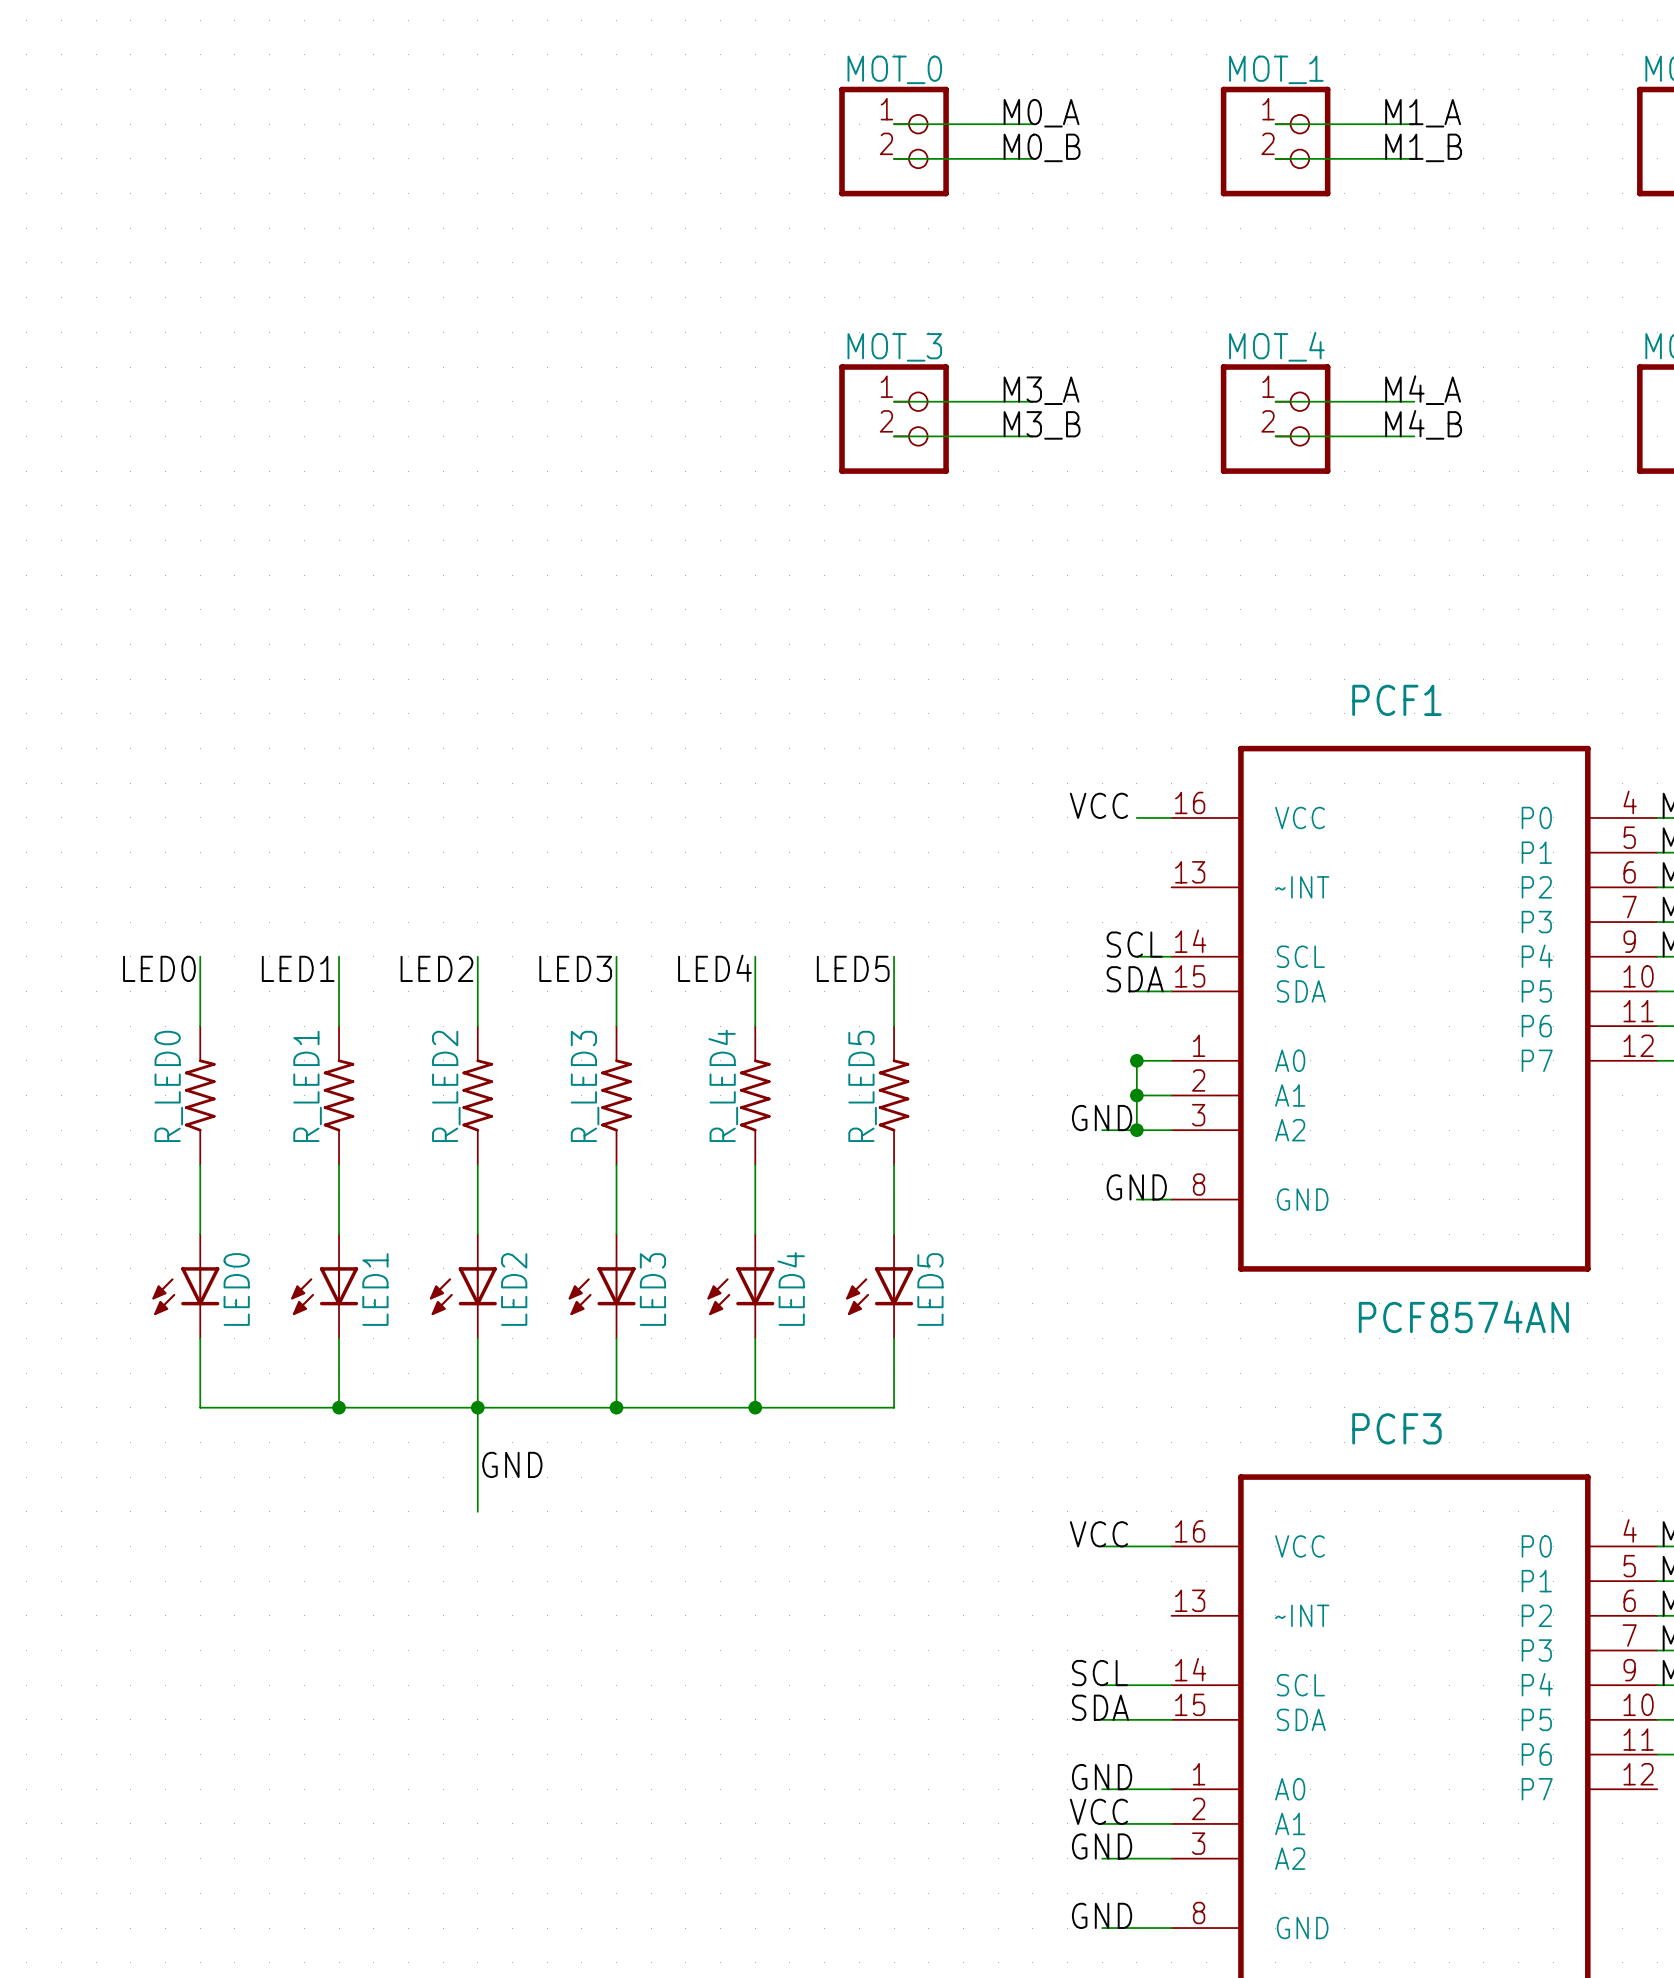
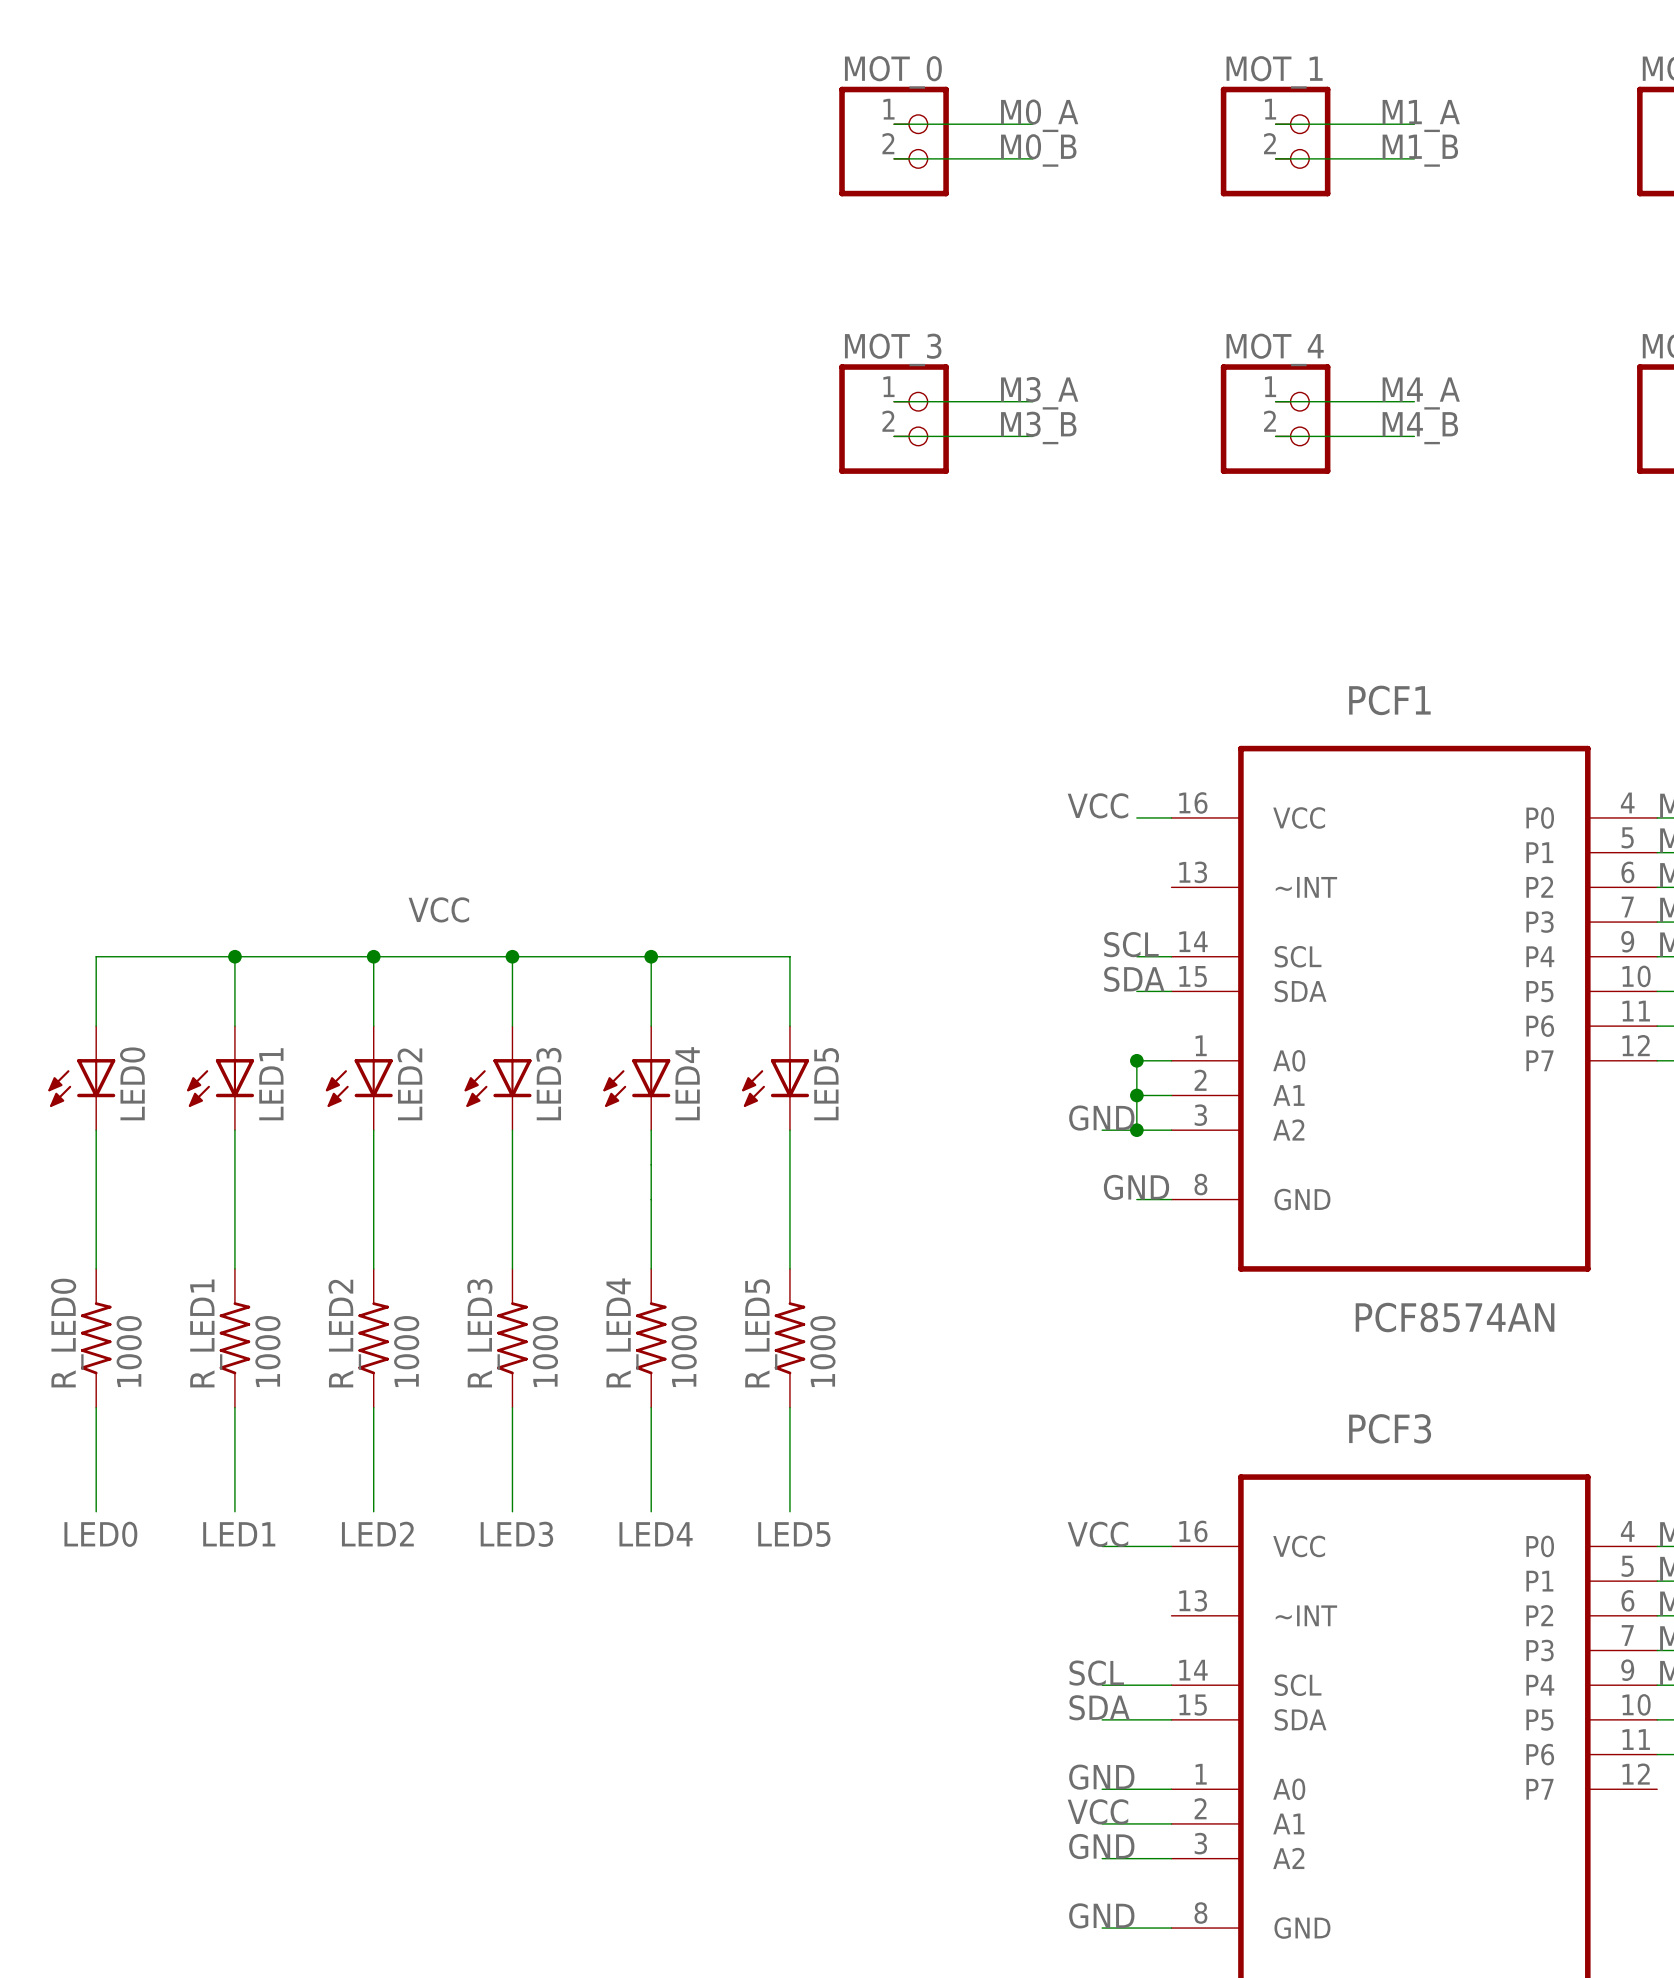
label: none -> VCC (438, 909)
wire: (200, 956) (200, 1026) -> (234, 956) (234, 1026)
junction: none -> (234, 956)
wire: (339, 956) (339, 1026) -> (373, 956) (373, 1026)
junction: none -> (373, 956)
wire: (477, 956) (477, 1026) -> (512, 956) (512, 1026)
junction: none -> (512, 956)
wire: (616, 956) (616, 1026) -> (651, 956) (651, 1026)
junction: none -> (651, 956)
wire: (755, 956) (755, 1026) -> none
wire: (894, 956) (894, 1026) -> none
label: LED0 (159, 968) -> none
label: LED1 (298, 968) -> none
label: LED2 (436, 968) -> none
label: LED3 (575, 968) -> none
label: LED4 (714, 968) -> none
label: LED5 (853, 968) -> none
wire: none -> (96, 1026) (96, 956) (789, 956) (789, 1026)
R_LED0 position: (200, 1095) -> (96, 1338)
R_LED1 position: (339, 1095) -> (234, 1338)
R_LED2 position: (477, 1095) -> (373, 1338)
R_LED3 position: (616, 1095) -> (512, 1338)
R_LED4 position: (755, 1095) -> (651, 1338)
R_LED5 position: (894, 1095) -> (789, 1338)
wire: none -> (96, 1130) (96, 1268)
wire: none -> (234, 1130) (234, 1268)
wire: none -> (373, 1130) (373, 1268)
wire: none -> (512, 1130) (512, 1268)
wire: none -> (651, 1130) (651, 1268)
wire: none -> (789, 1130) (789, 1268)
wire: (200, 1164) (200, 1234) -> none
wire: (339, 1164) (339, 1234) -> none
wire: (477, 1164) (477, 1234) -> none
wire: (616, 1164) (616, 1234) -> none
wire: (755, 1164) (755, 1234) -> none
wire: (894, 1164) (894, 1234) -> none
LED0 position: (185, 1286) -> (81, 1078)
LED1 position: (324, 1286) -> (220, 1078)
LED2 position: (463, 1286) -> (359, 1078)
LED3 position: (602, 1286) -> (498, 1078)
LED4 position: (740, 1286) -> (636, 1078)
LED5 position: (879, 1286) -> (775, 1078)
wire: (200, 1338) (200, 1407) (894, 1407) (894, 1338) -> none
wire: (339, 1338) (339, 1407) -> none
wire: (477, 1338) (477, 1511) -> none
wire: (616, 1338) (616, 1407) -> none
wire: (755, 1338) (755, 1407) -> none
R_LED0 value: none -> 1000 (129, 1351)
R_LED1 value: none -> 1000 (267, 1351)
R_LED2 value: none -> 1000 (406, 1351)
R_LED3 value: none -> 1000 (545, 1351)
R_LED4 value: none -> 1000 (684, 1351)
R_LED5 value: none -> 1000 (822, 1351)
wire: none -> (96, 1407) (96, 1511)
wire: none -> (234, 1407) (234, 1511)
junction: (339, 1407) -> none
wire: none -> (373, 1407) (373, 1511)
junction: (477, 1407) -> none
wire: none -> (512, 1407) (512, 1511)
junction: (616, 1407) -> none
wire: none -> (651, 1407) (651, 1511)
junction: (755, 1407) -> none
wire: none -> (789, 1407) (789, 1511)
label: GND (512, 1464) -> none
label: none -> LED4 (656, 1534)
label: none -> LED0 (100, 1534)
label: none -> LED1 (239, 1534)
label: none -> LED2 (377, 1534)
label: none -> LED3 (516, 1534)
label: none -> LED5 (794, 1534)

